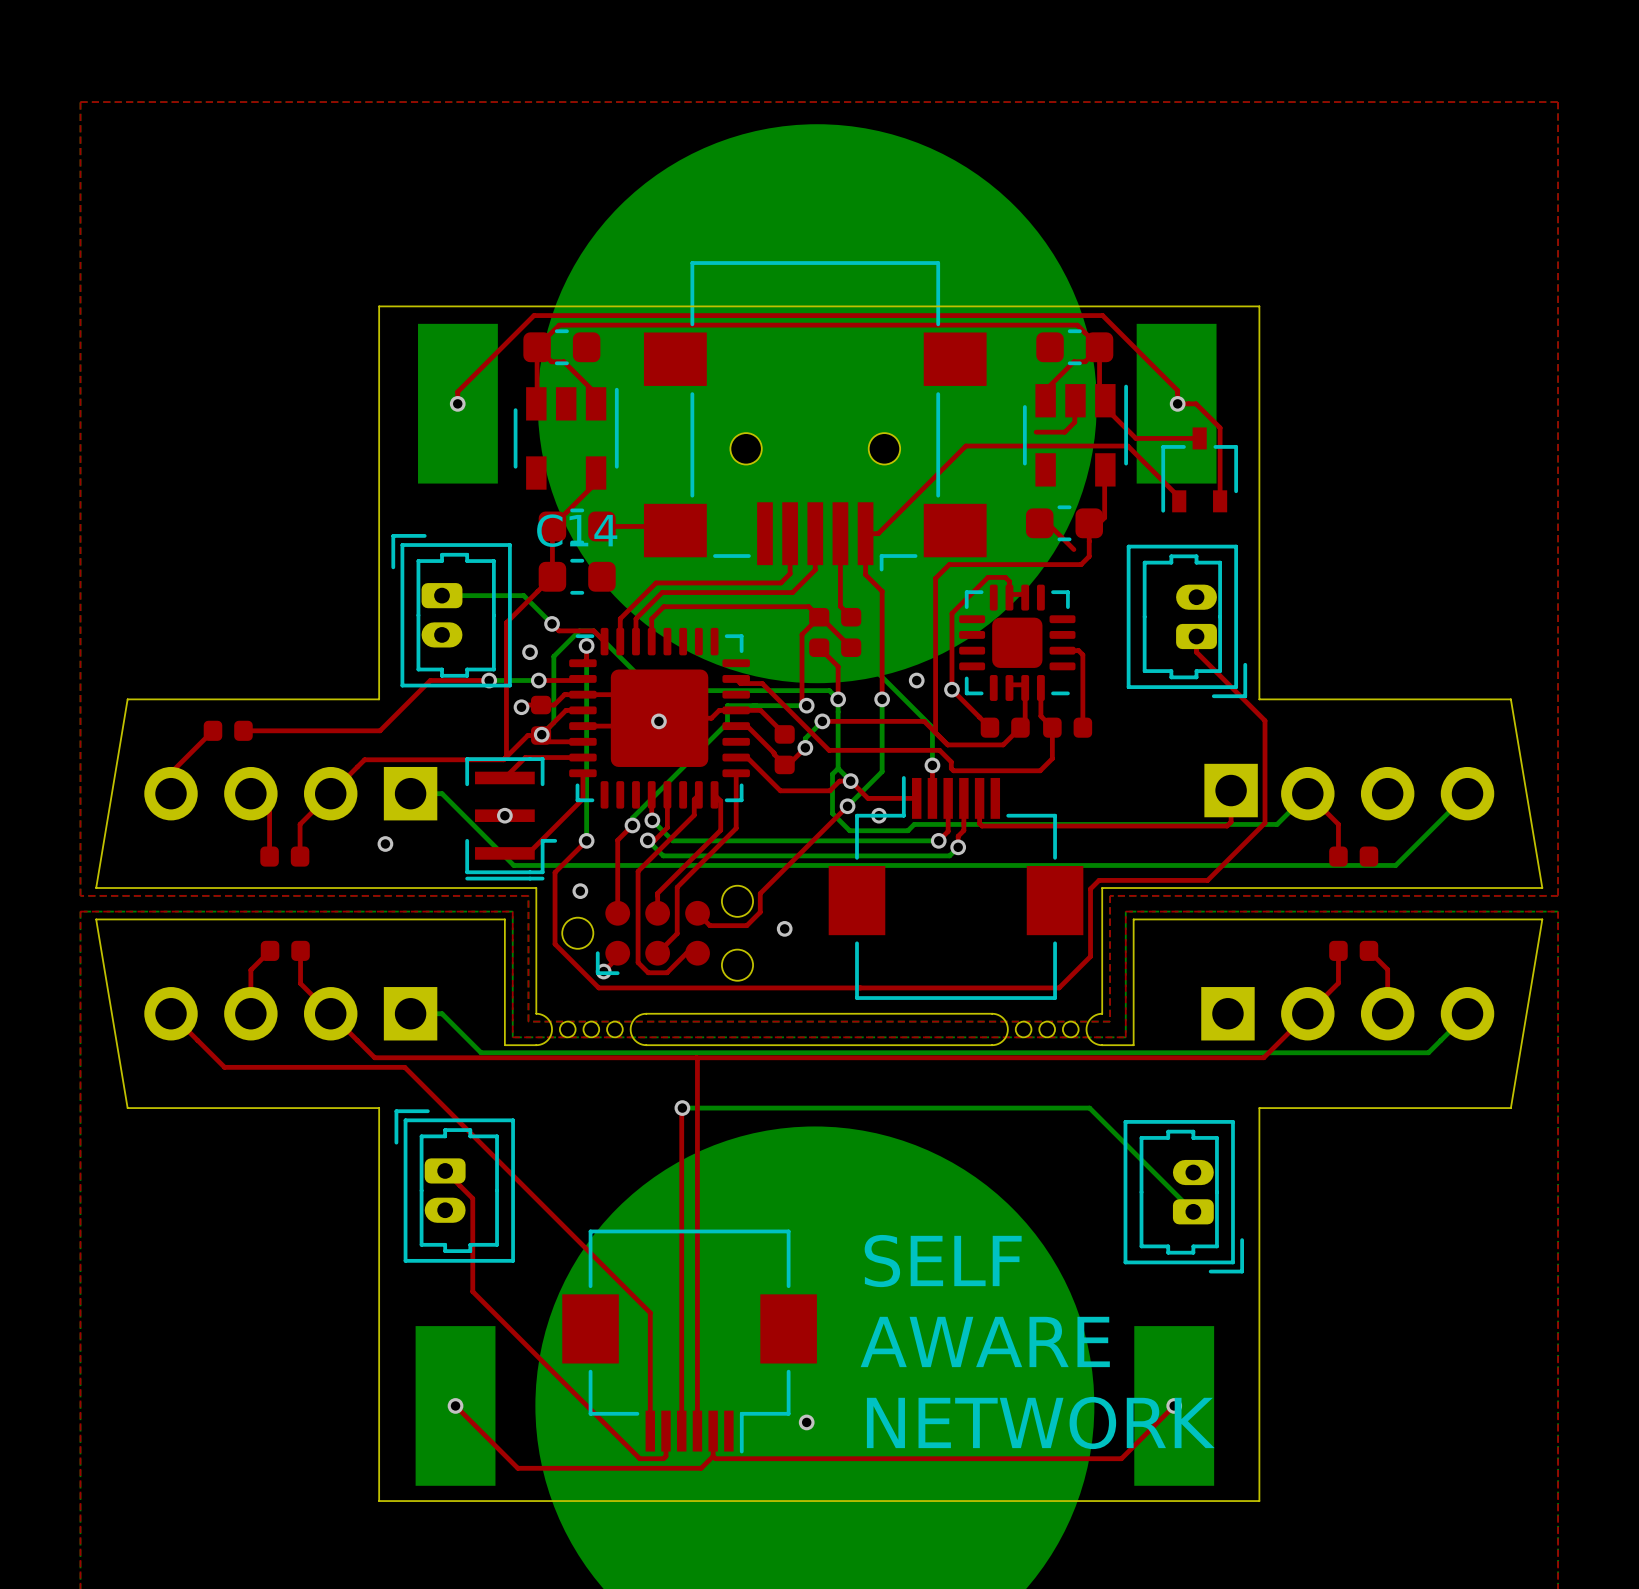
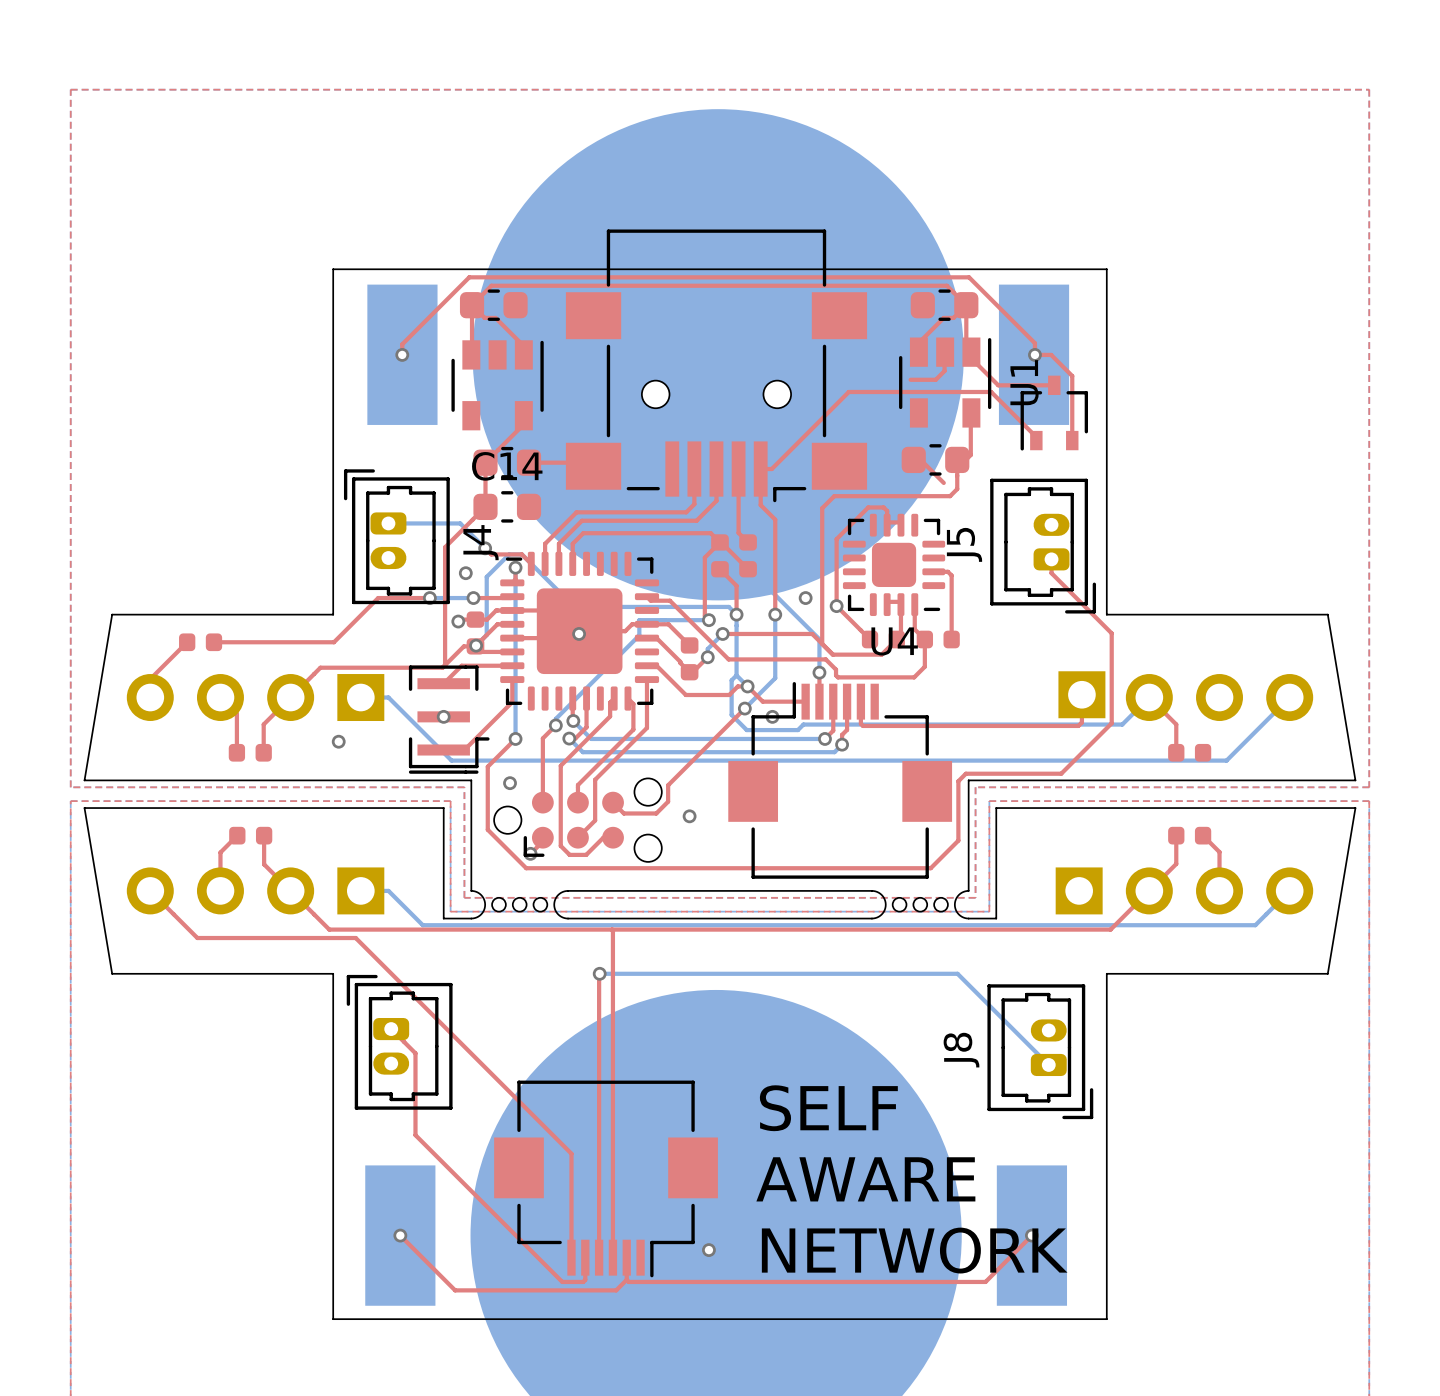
U1 name: none -> U1 (1024, 382)
J4 name: none -> J4 (481, 542)
J5 name: none -> J5 (964, 544)
U4 name: none -> U4 (894, 641)
J8 name: none -> J8 (961, 1050)

